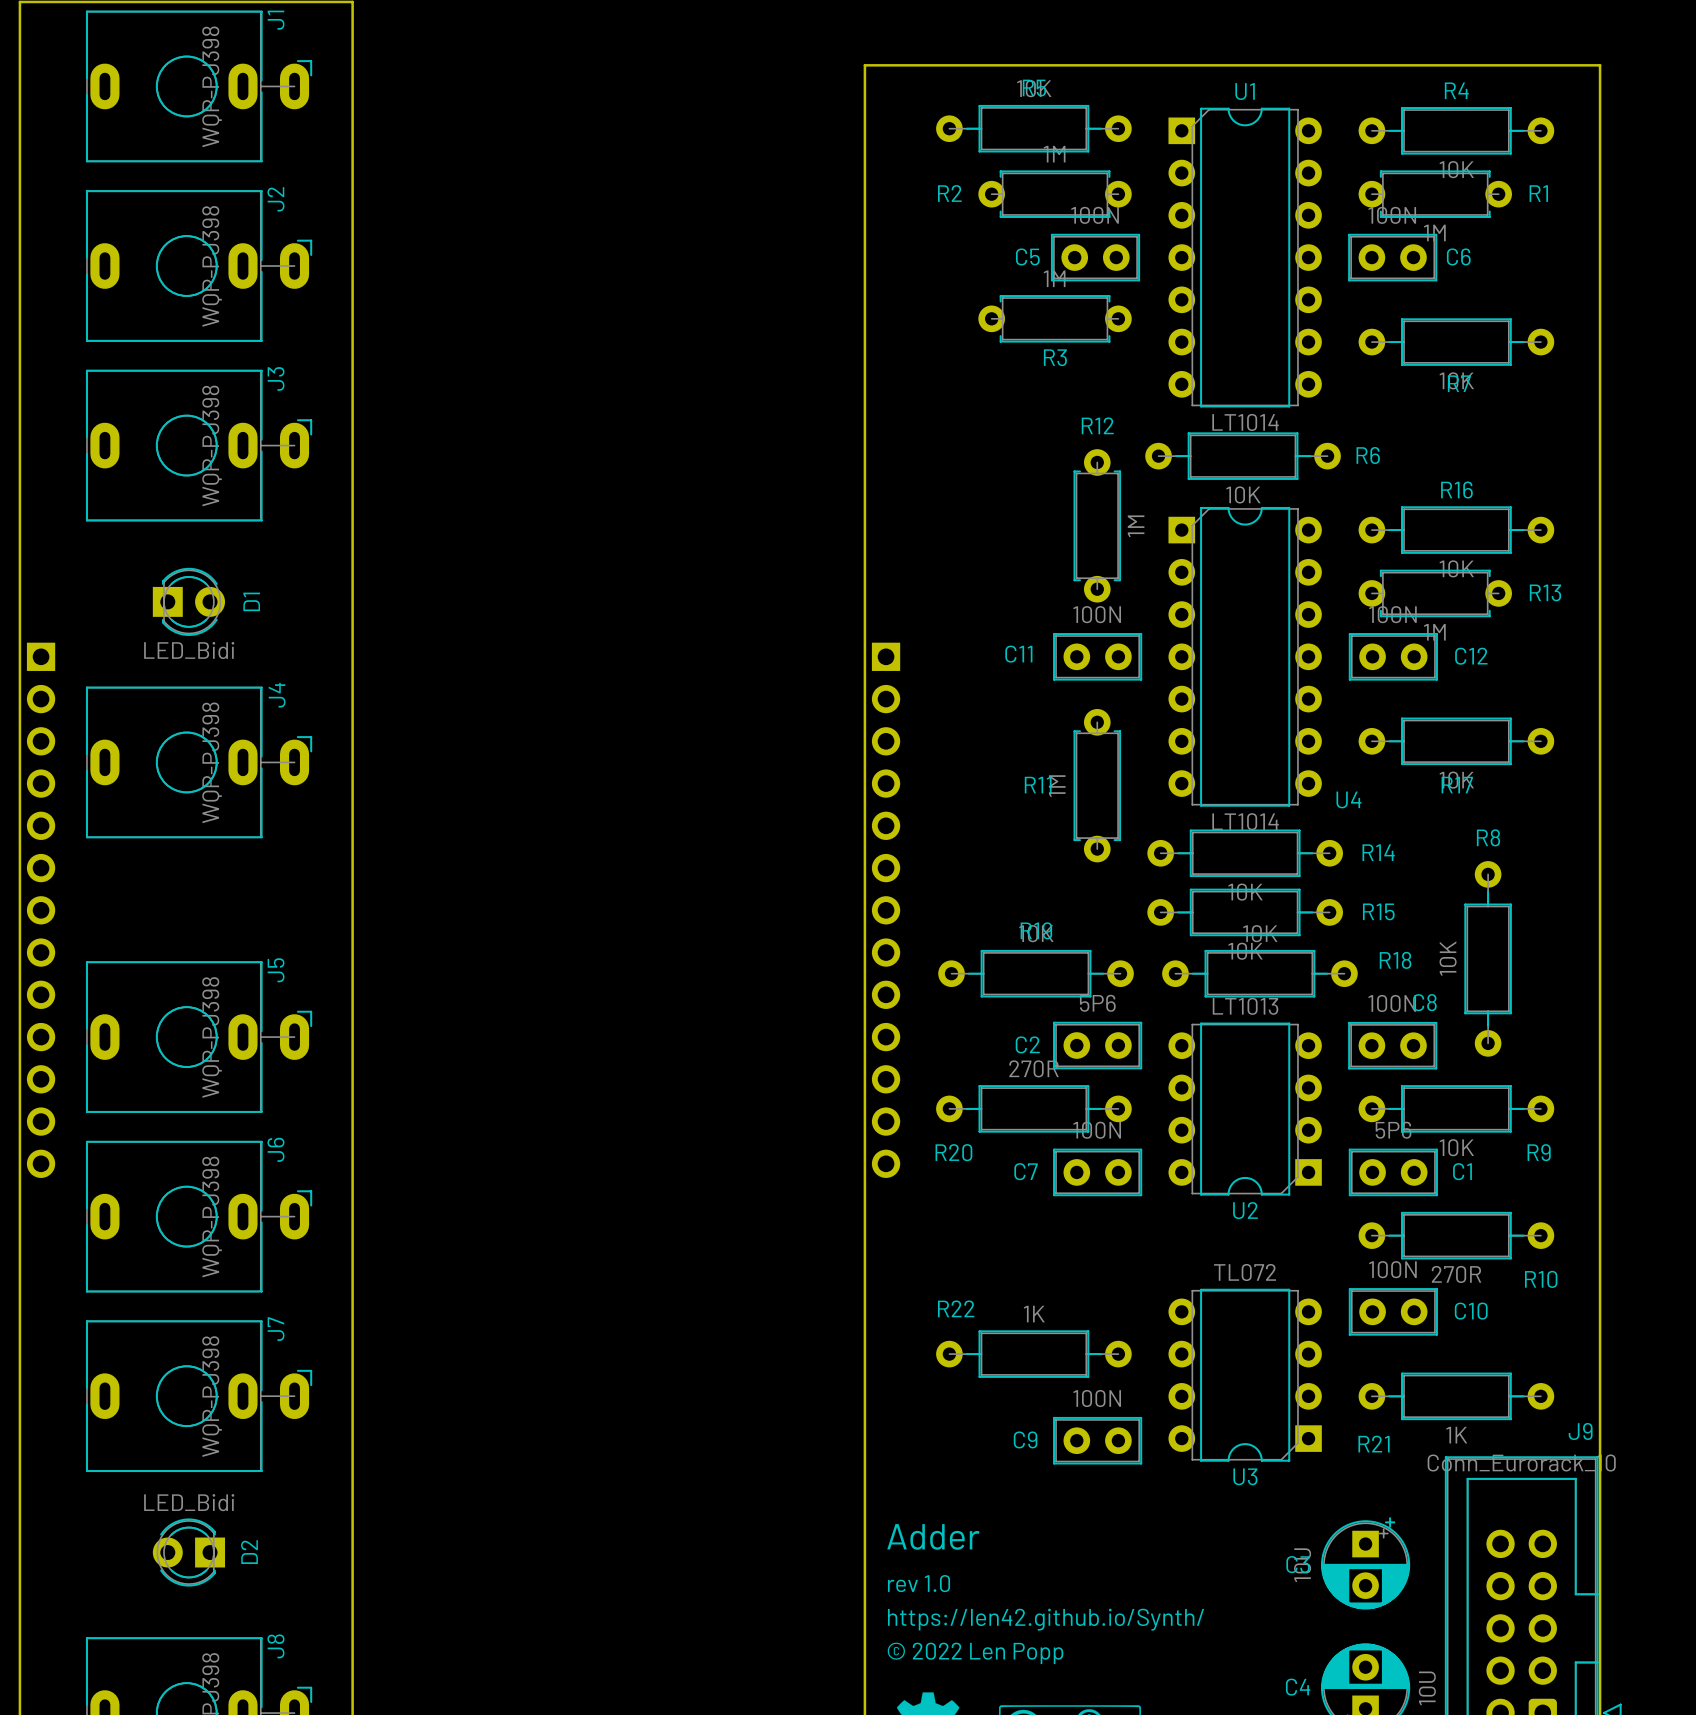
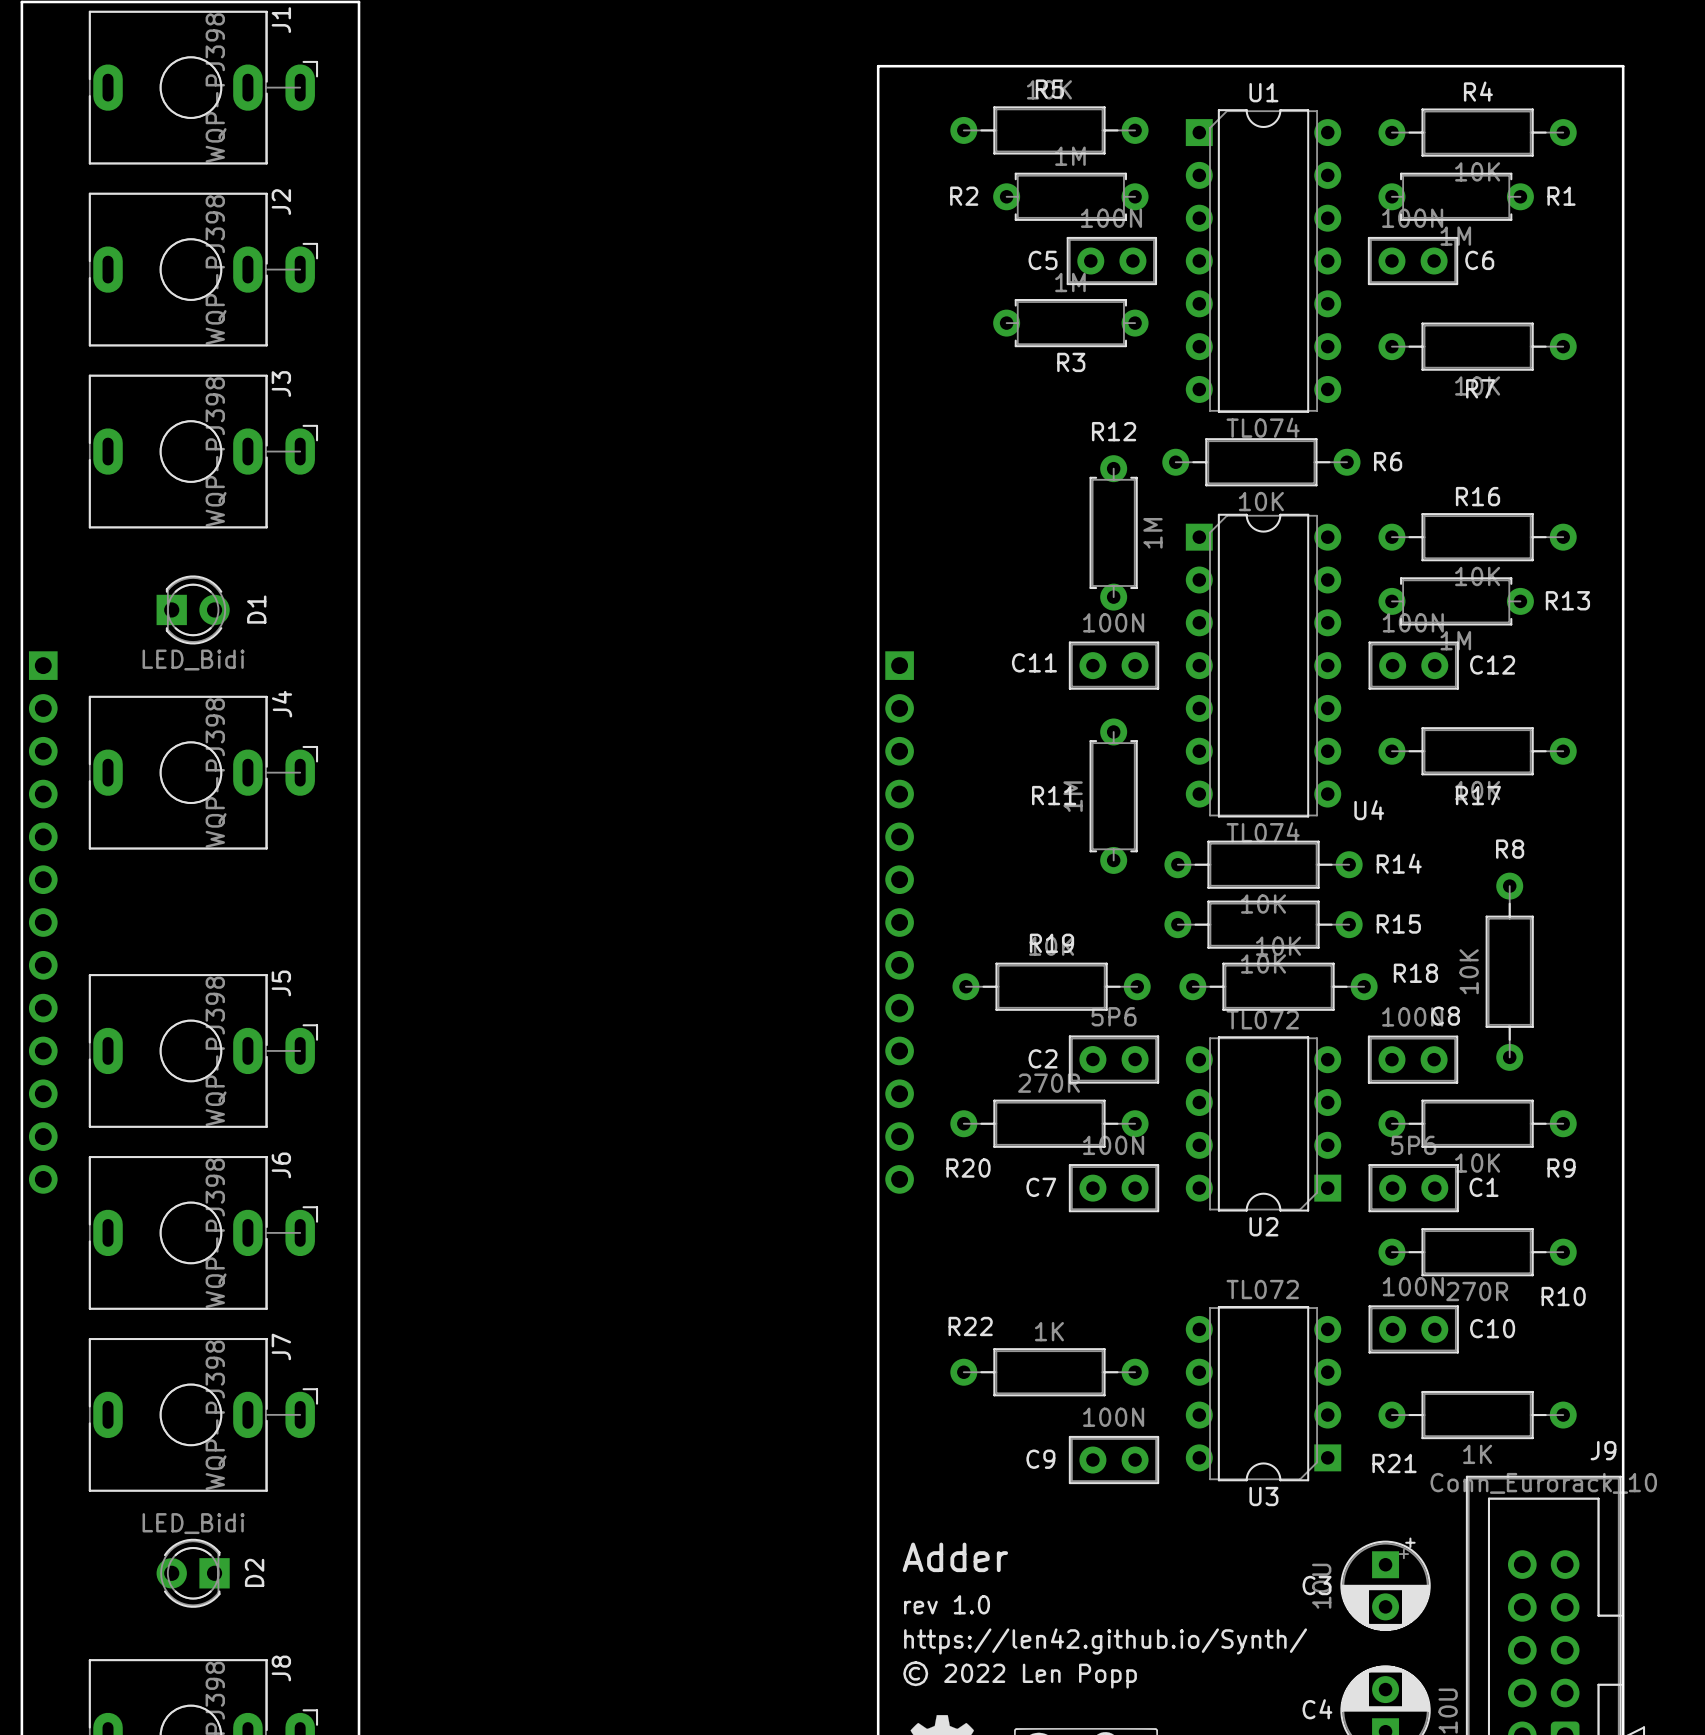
U1 value: LT1014 (1245, 422) -> TL074 (1263, 427)
U4 value: LT1014 (1245, 821) -> TL074 (1263, 832)
U2 value: LT1013 (1245, 1006) -> TL072 (1262, 1019)

